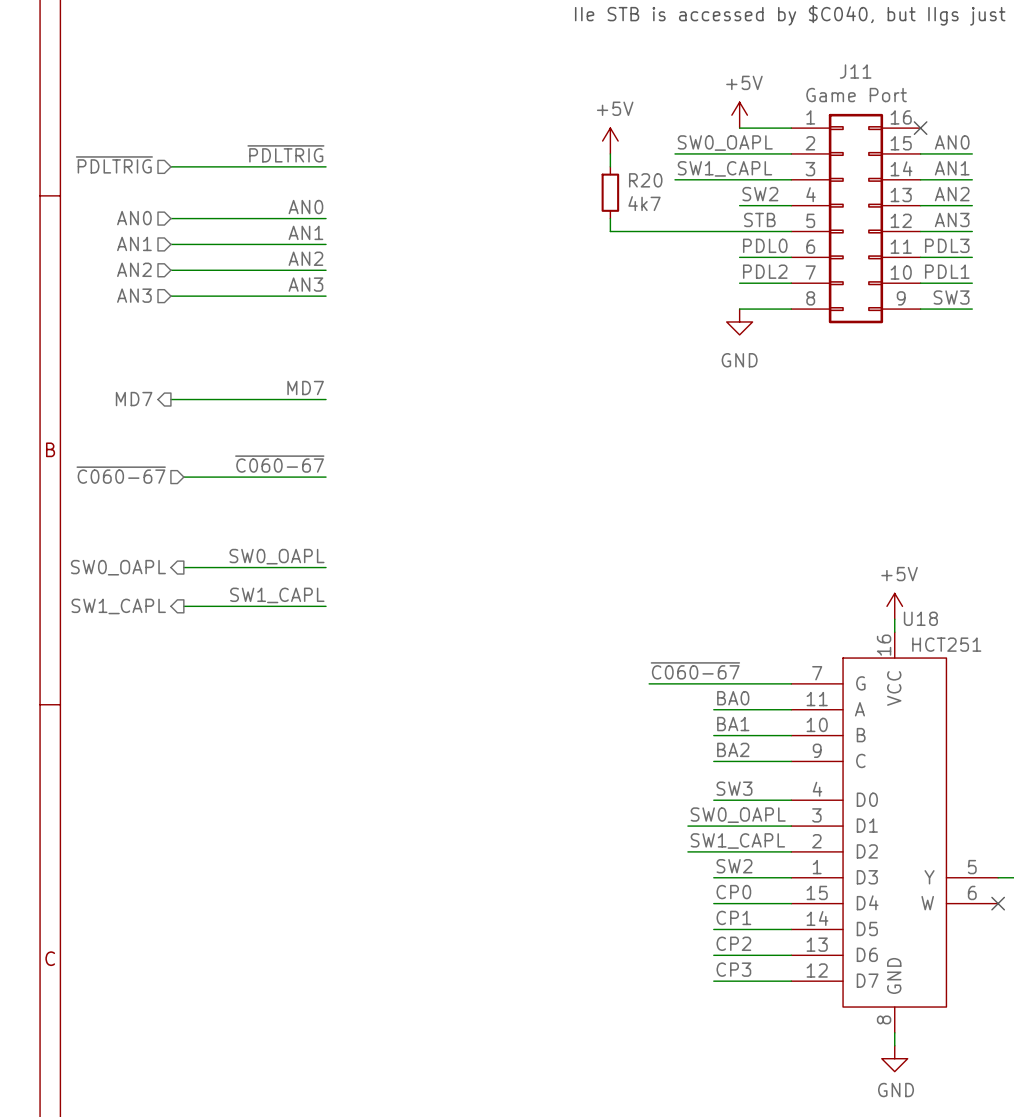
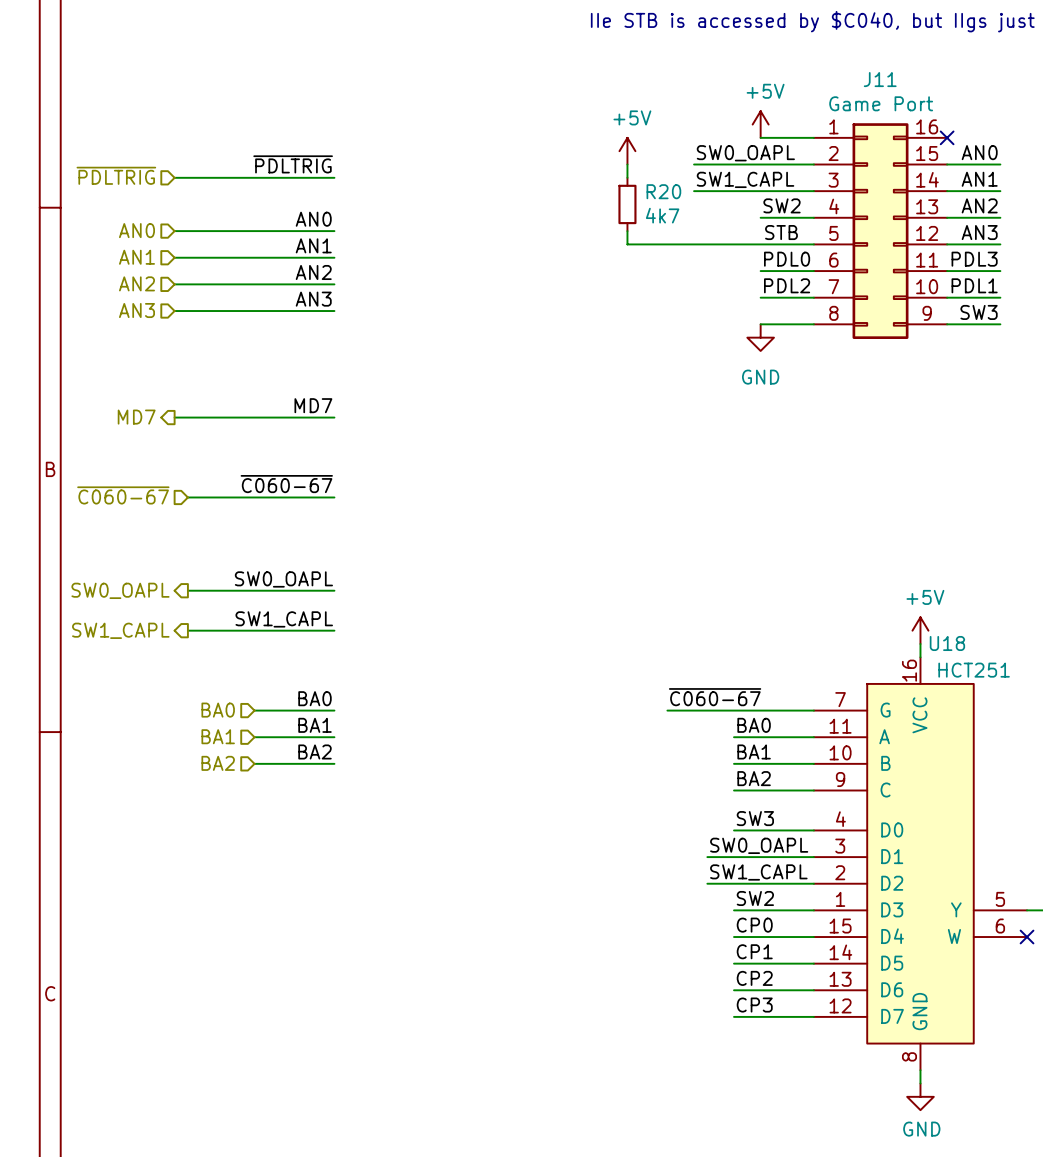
label: none -> BA0 (314, 698)
hierarchical label: none -> BA0 (218, 710)
wire: none -> (254, 710) (334, 710)
label: none -> BA1 (314, 725)
hierarchical label: none -> BA1 (218, 736)
wire: none -> (254, 737) (334, 737)
label: none -> BA2 (314, 751)
hierarchical label: none -> BA2 (218, 763)
wire: none -> (254, 763) (334, 763)

